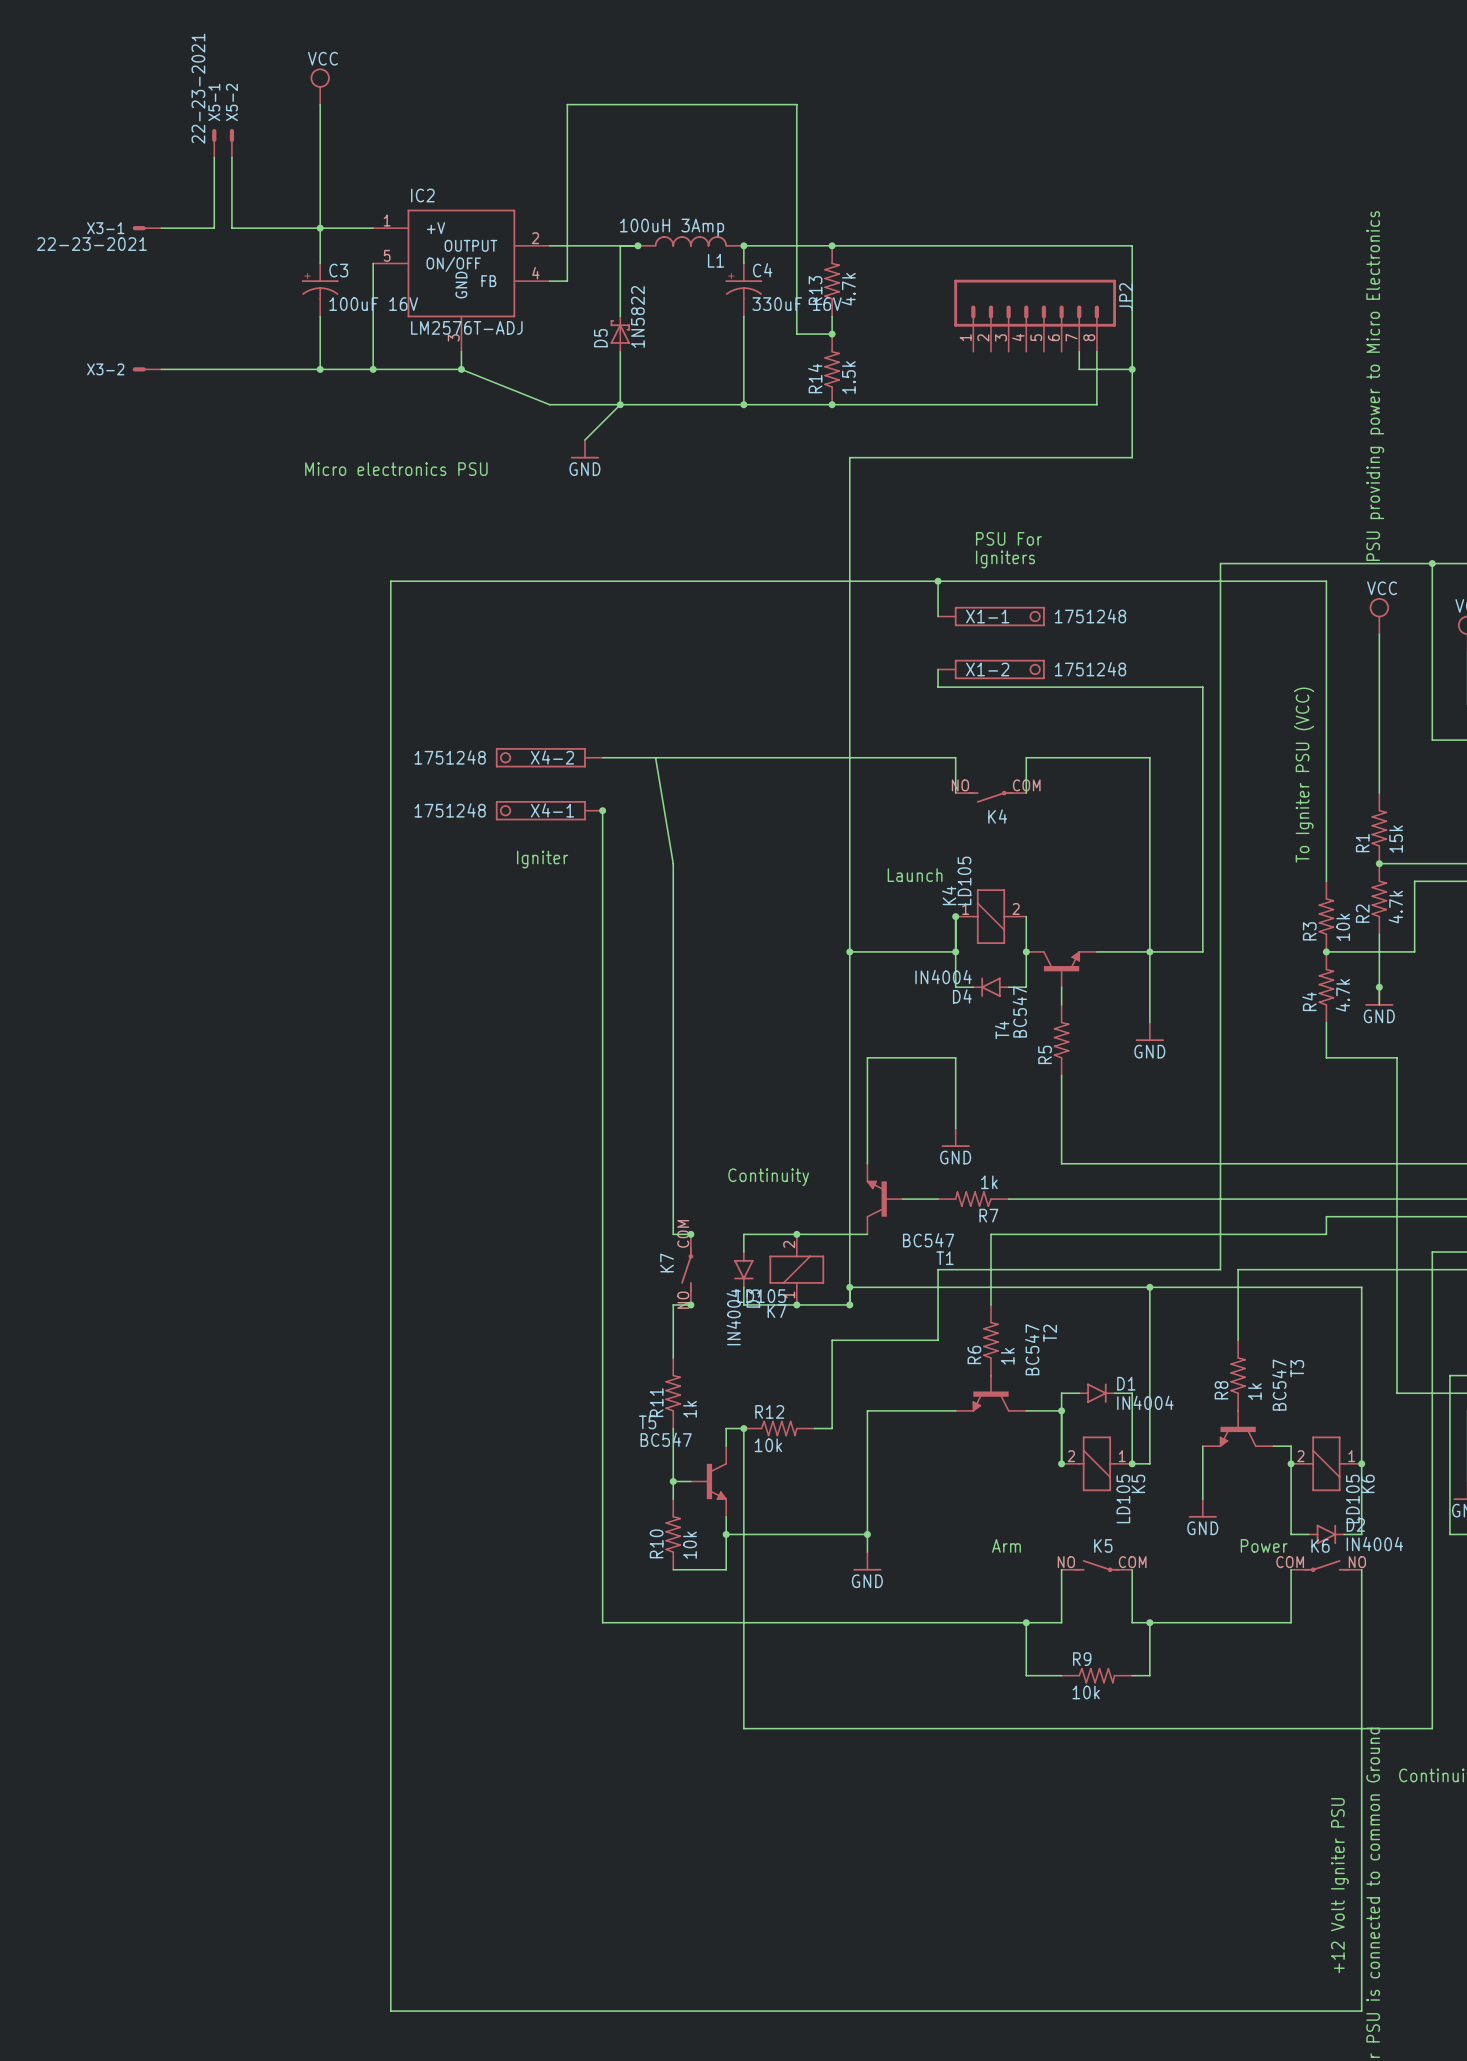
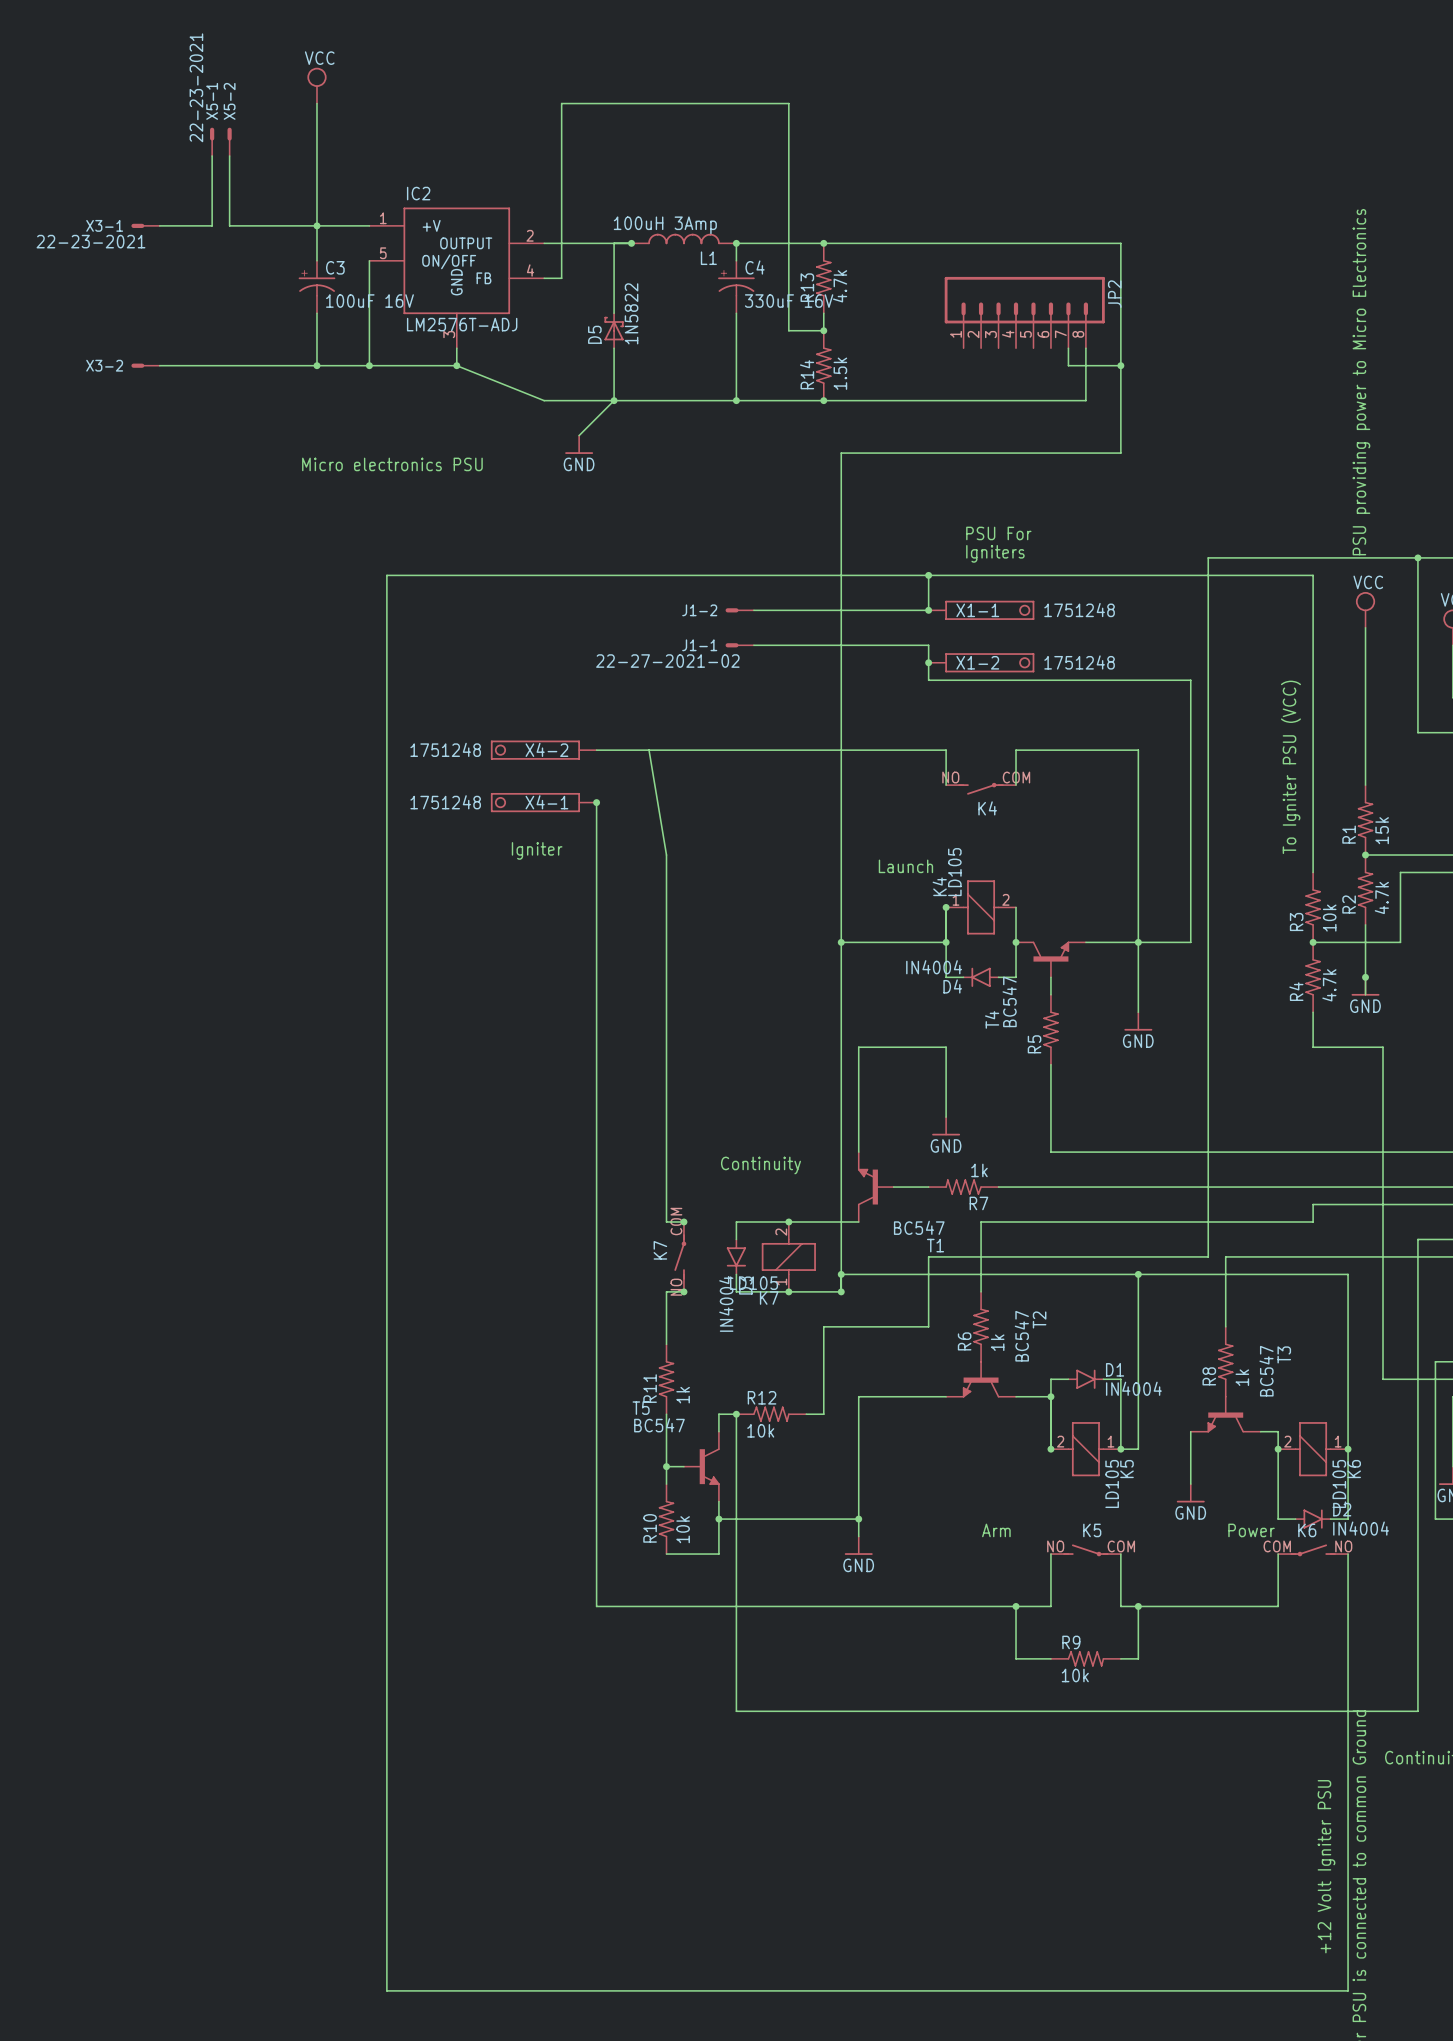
J1-2: none -> (739, 610)
wire: none -> (753, 610) (928, 610)
junction: none -> (928, 610)
J1-1: none -> 22-27-2021-02 (739, 645)
wire: none -> (753, 645) (928, 645) (928, 662)
junction: none -> (928, 662)

